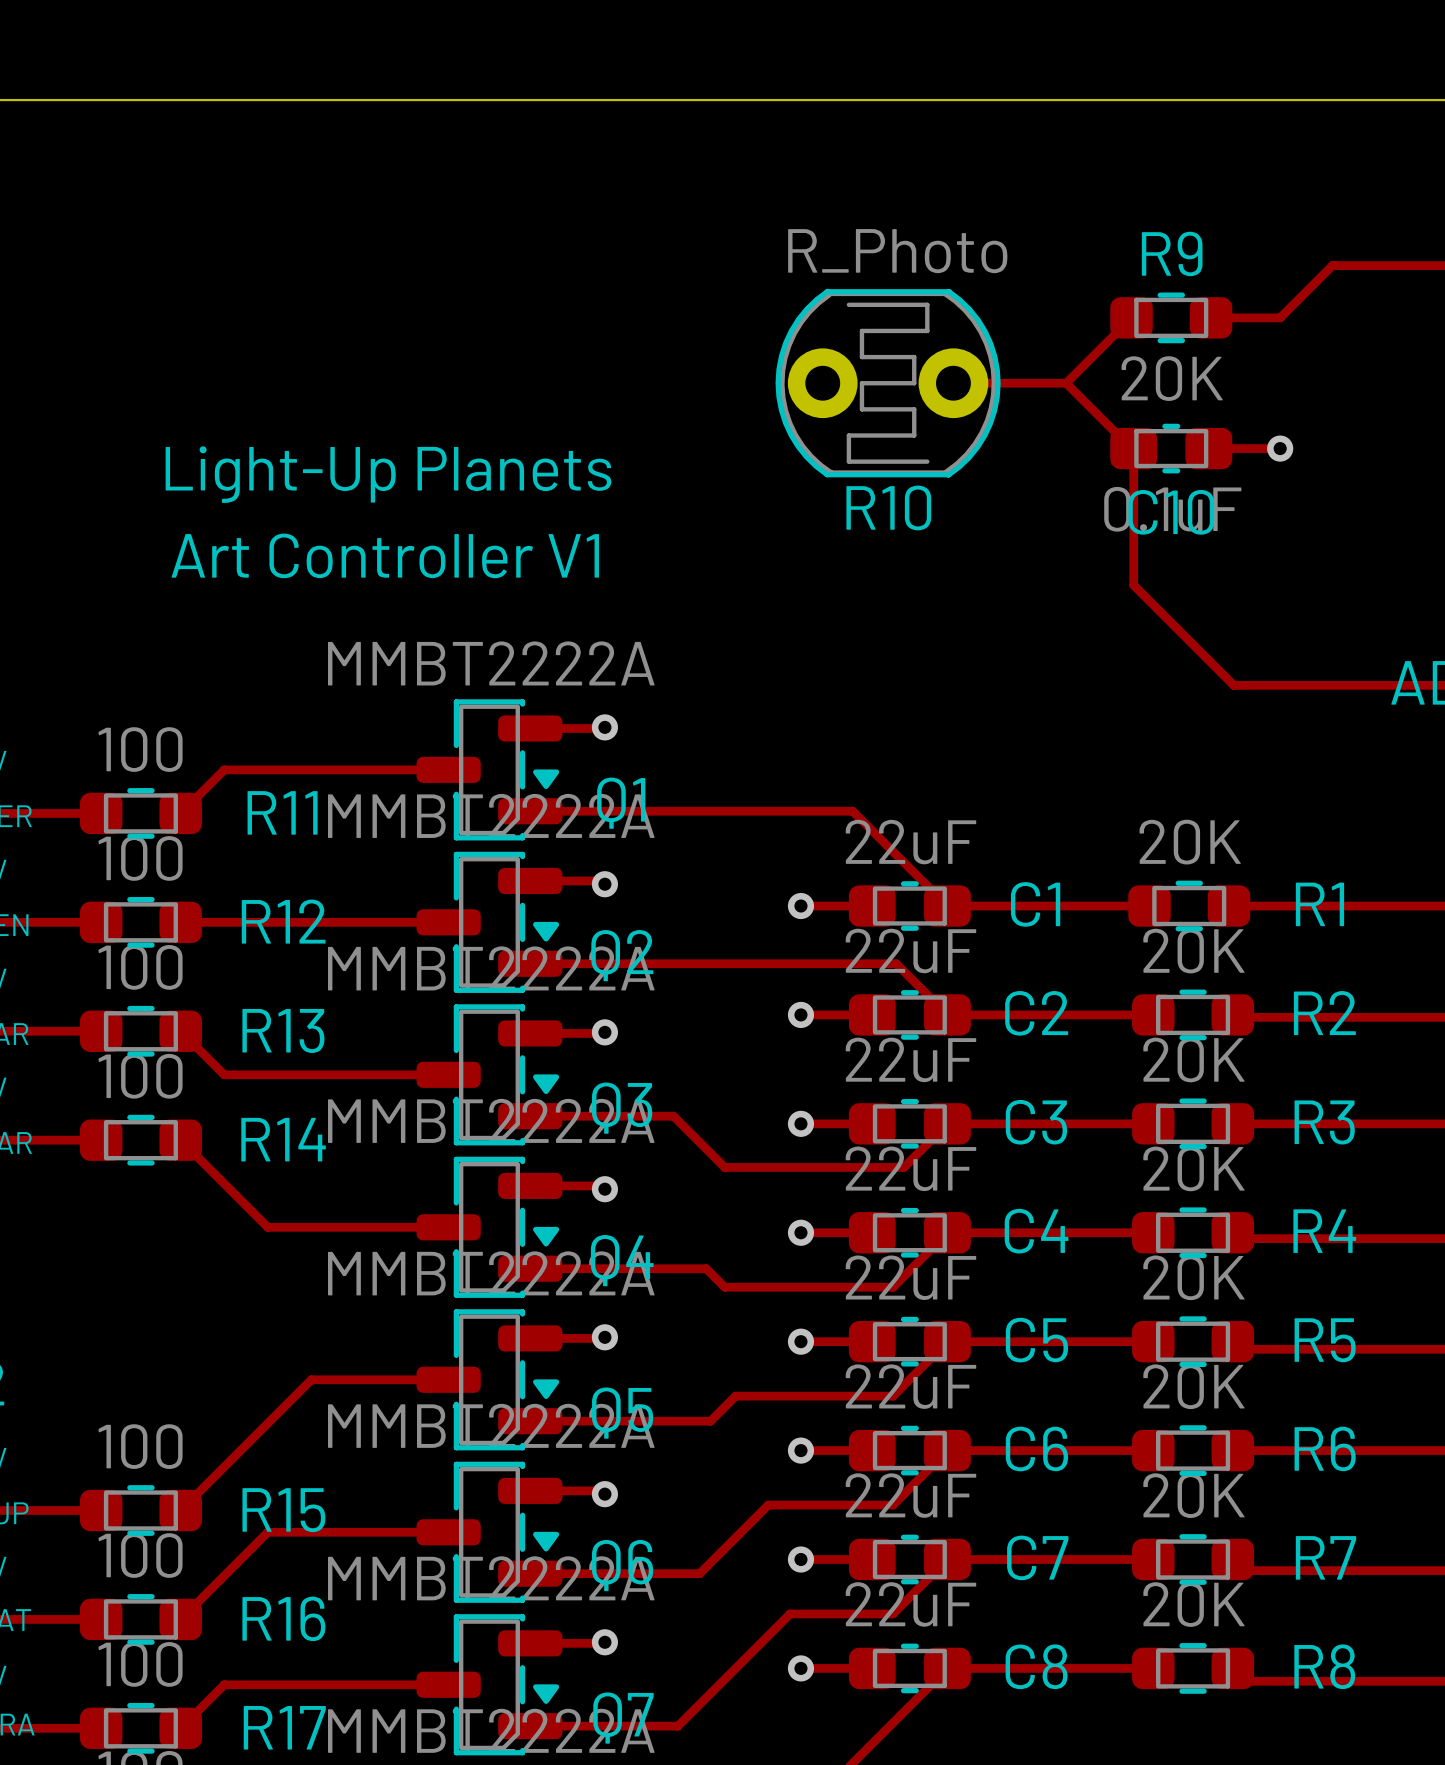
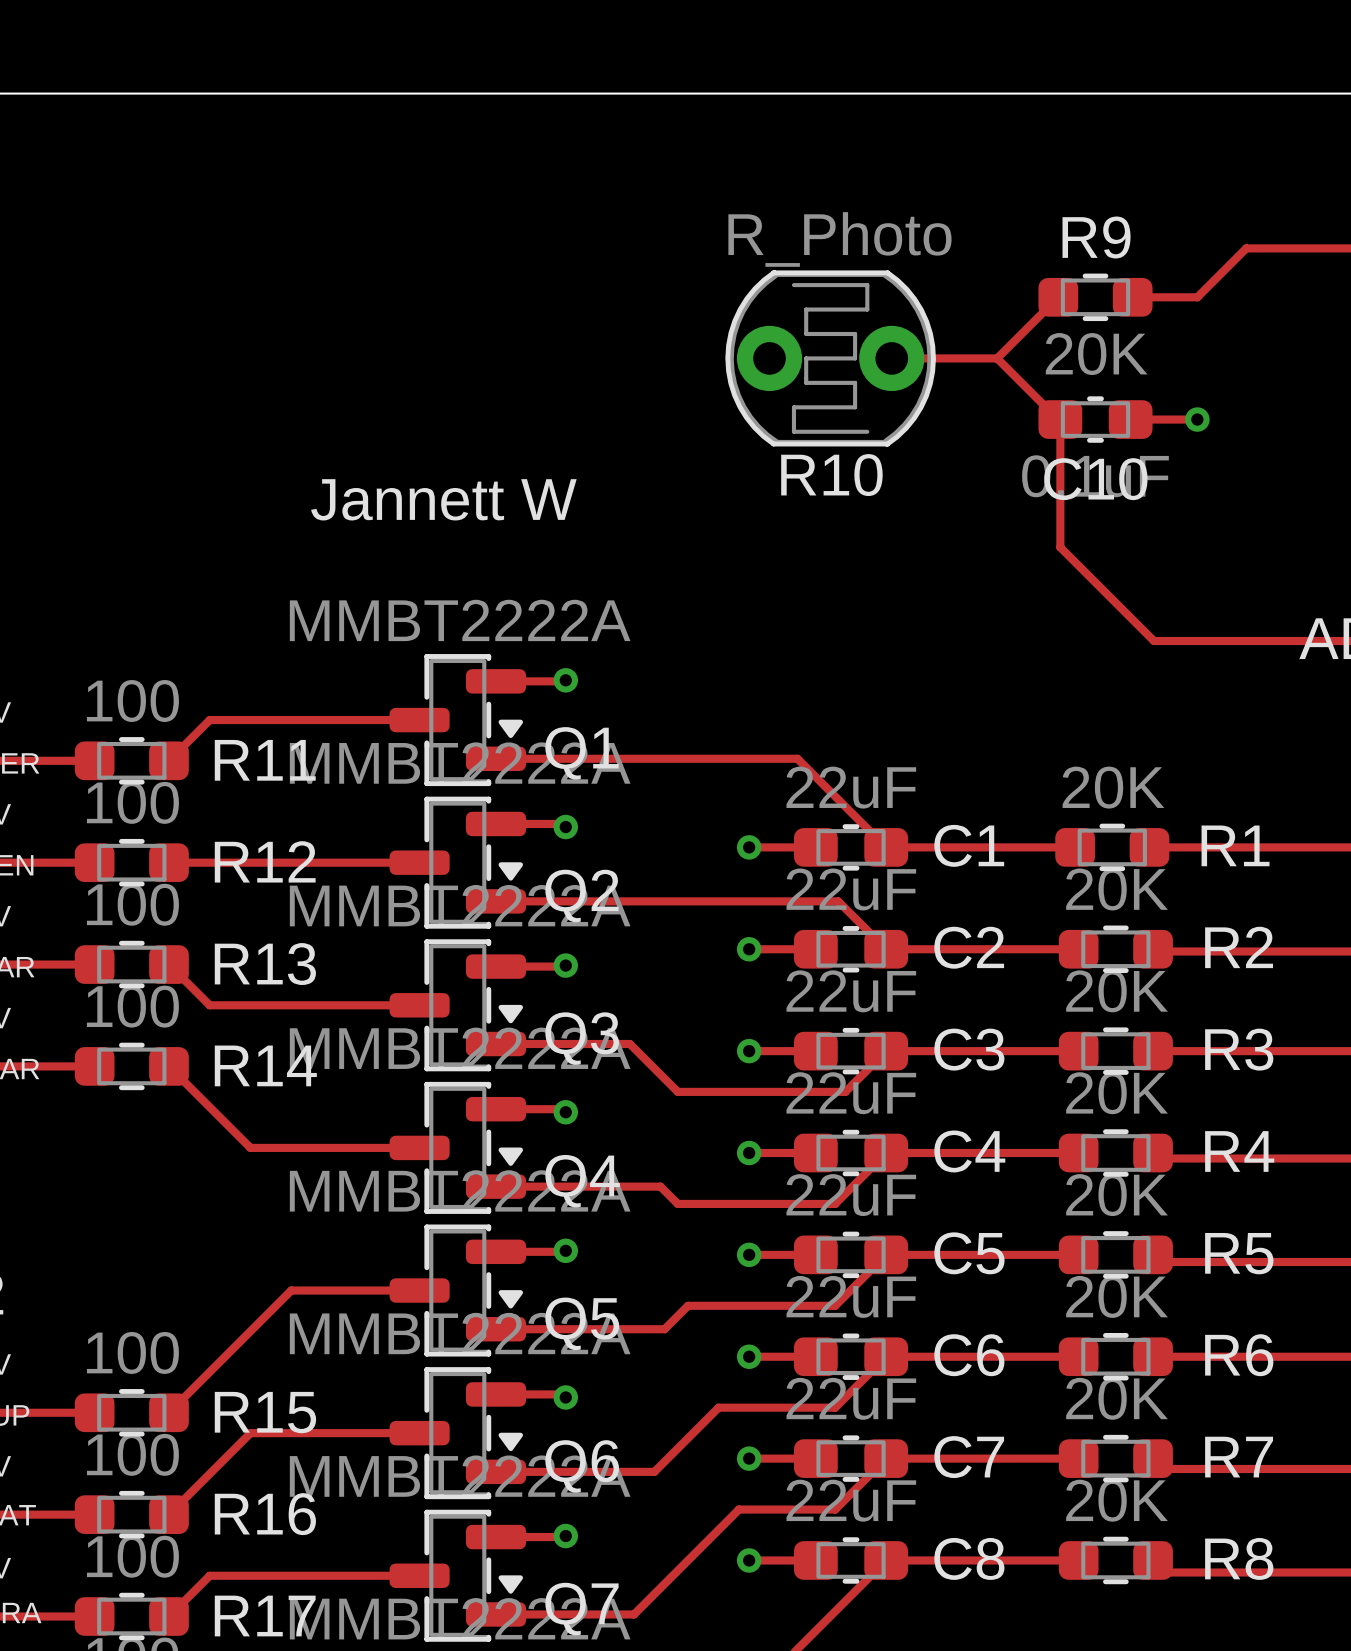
text: Light-Up Planets (388, 474) -> none
text: none -> Jannett W (443, 499)
text: Art Controller V1 (385, 555) -> none

